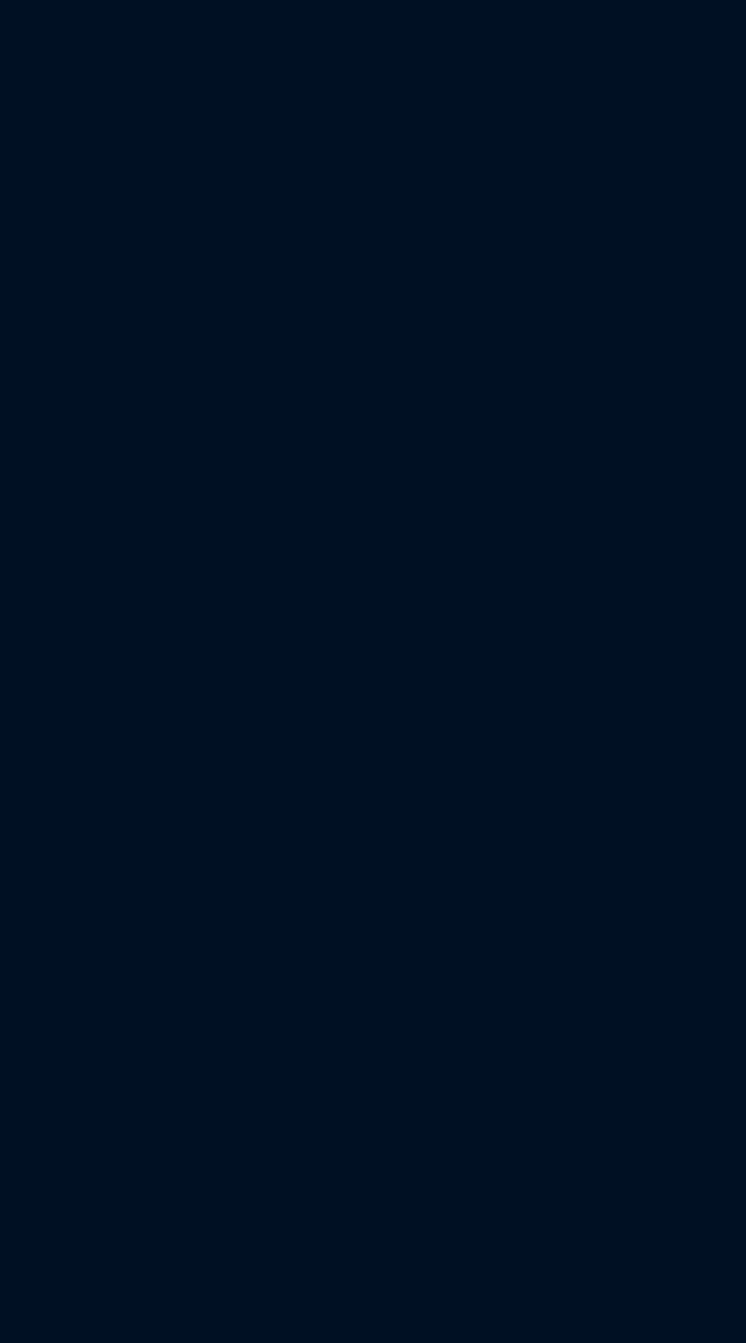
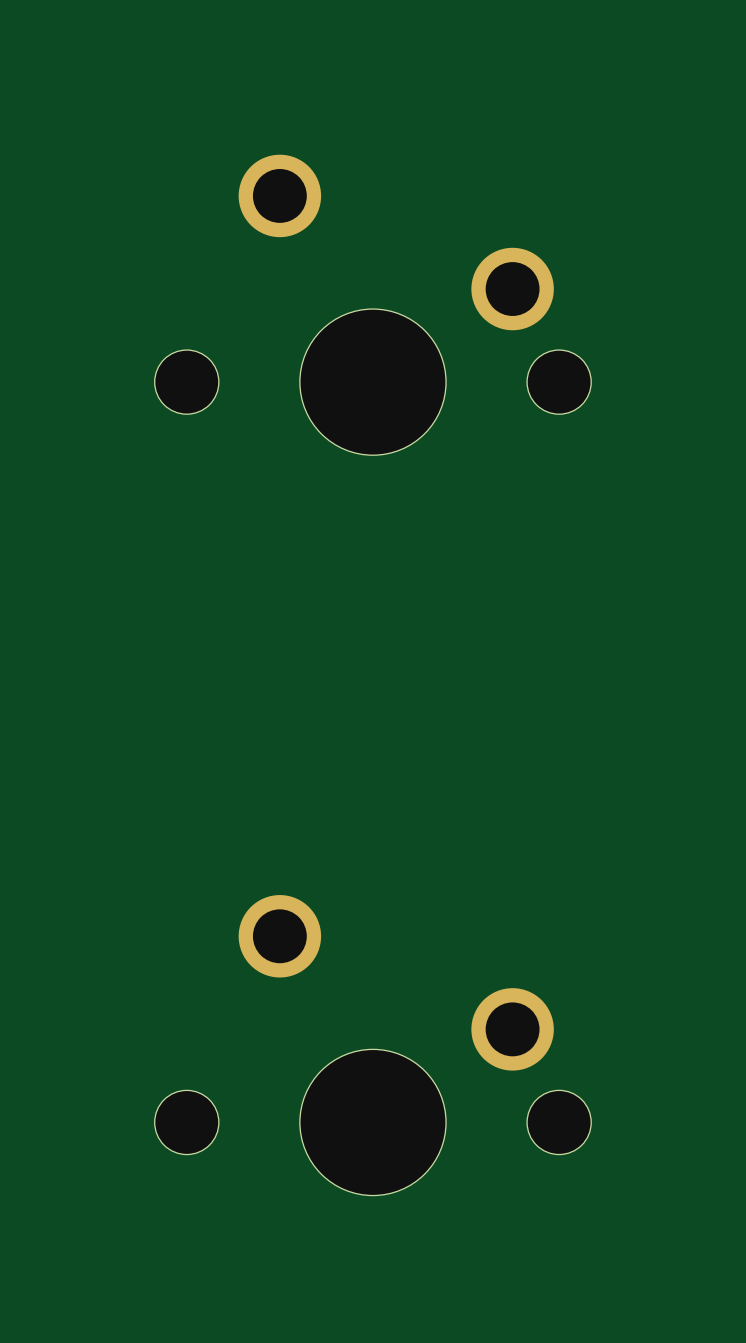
part: none -> (372, 304)
part: none -> (372, 1045)

